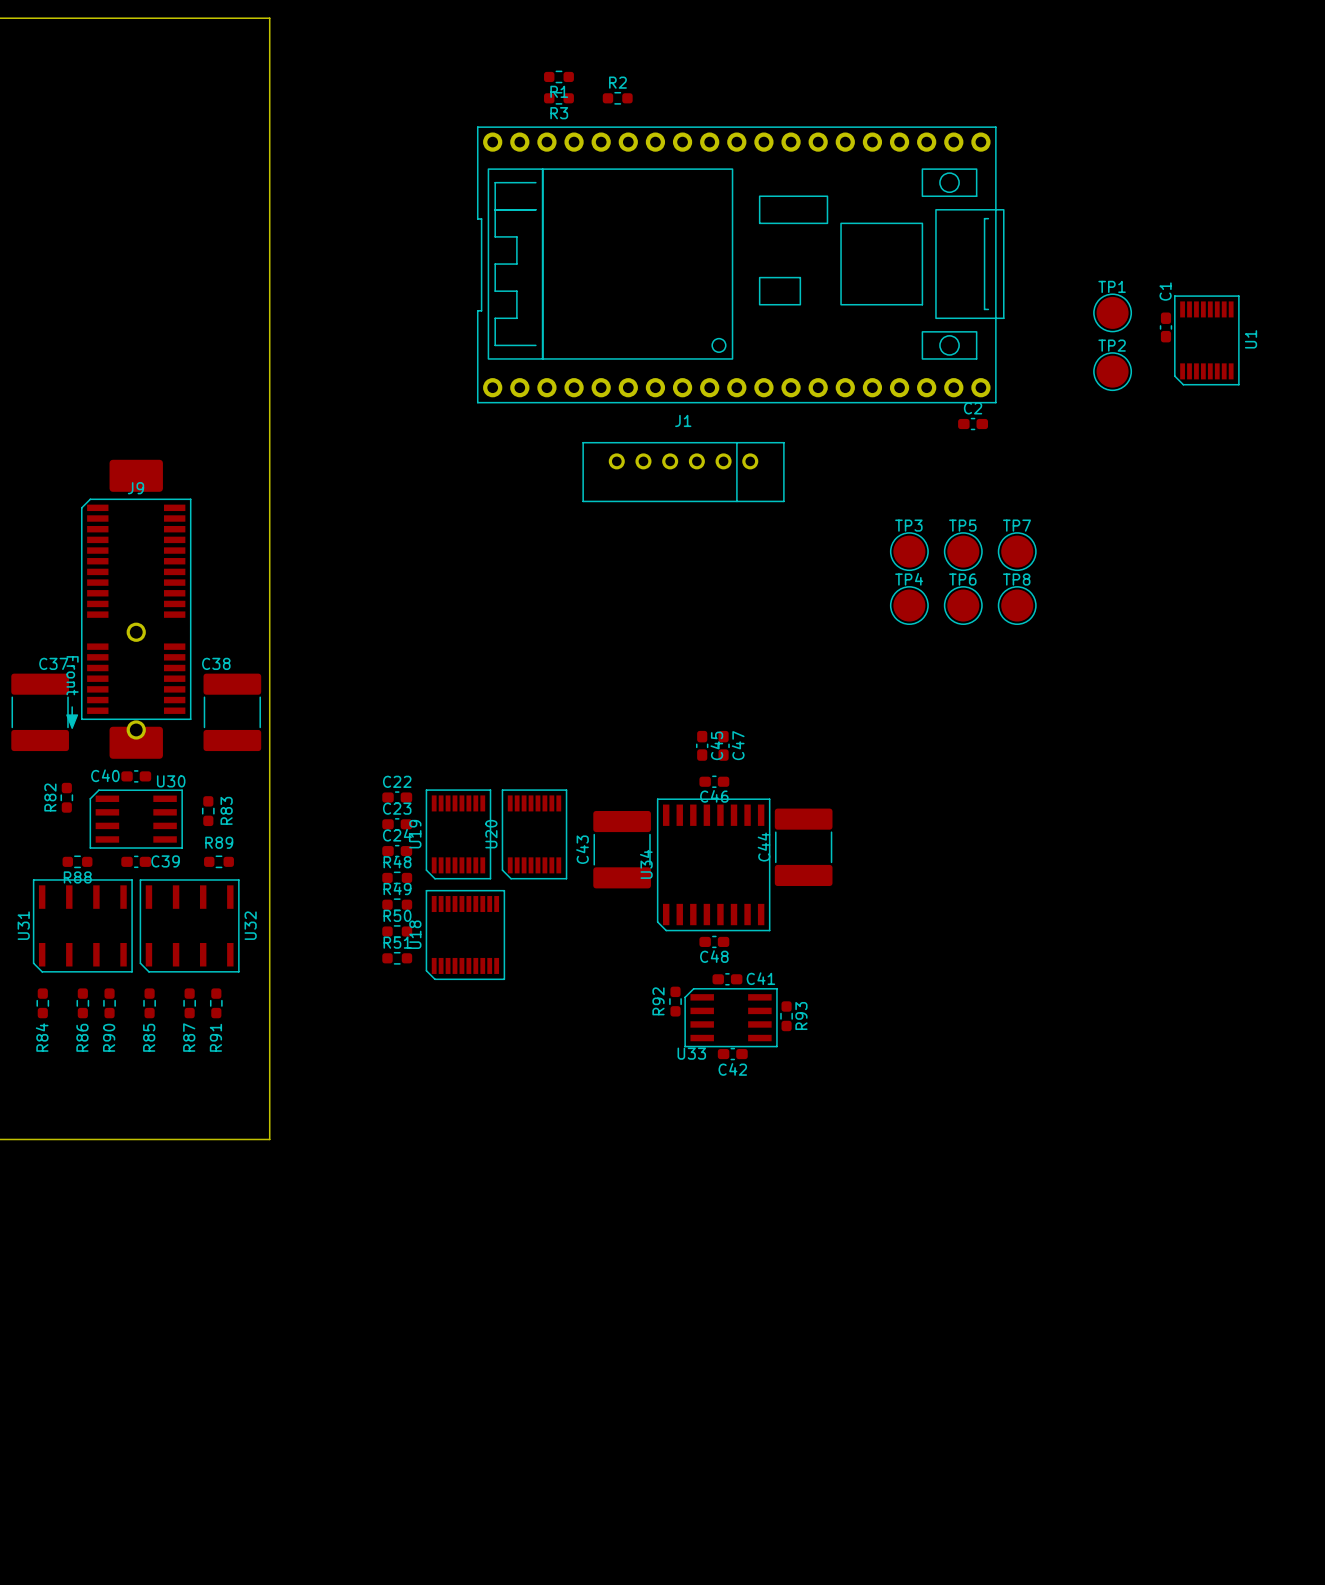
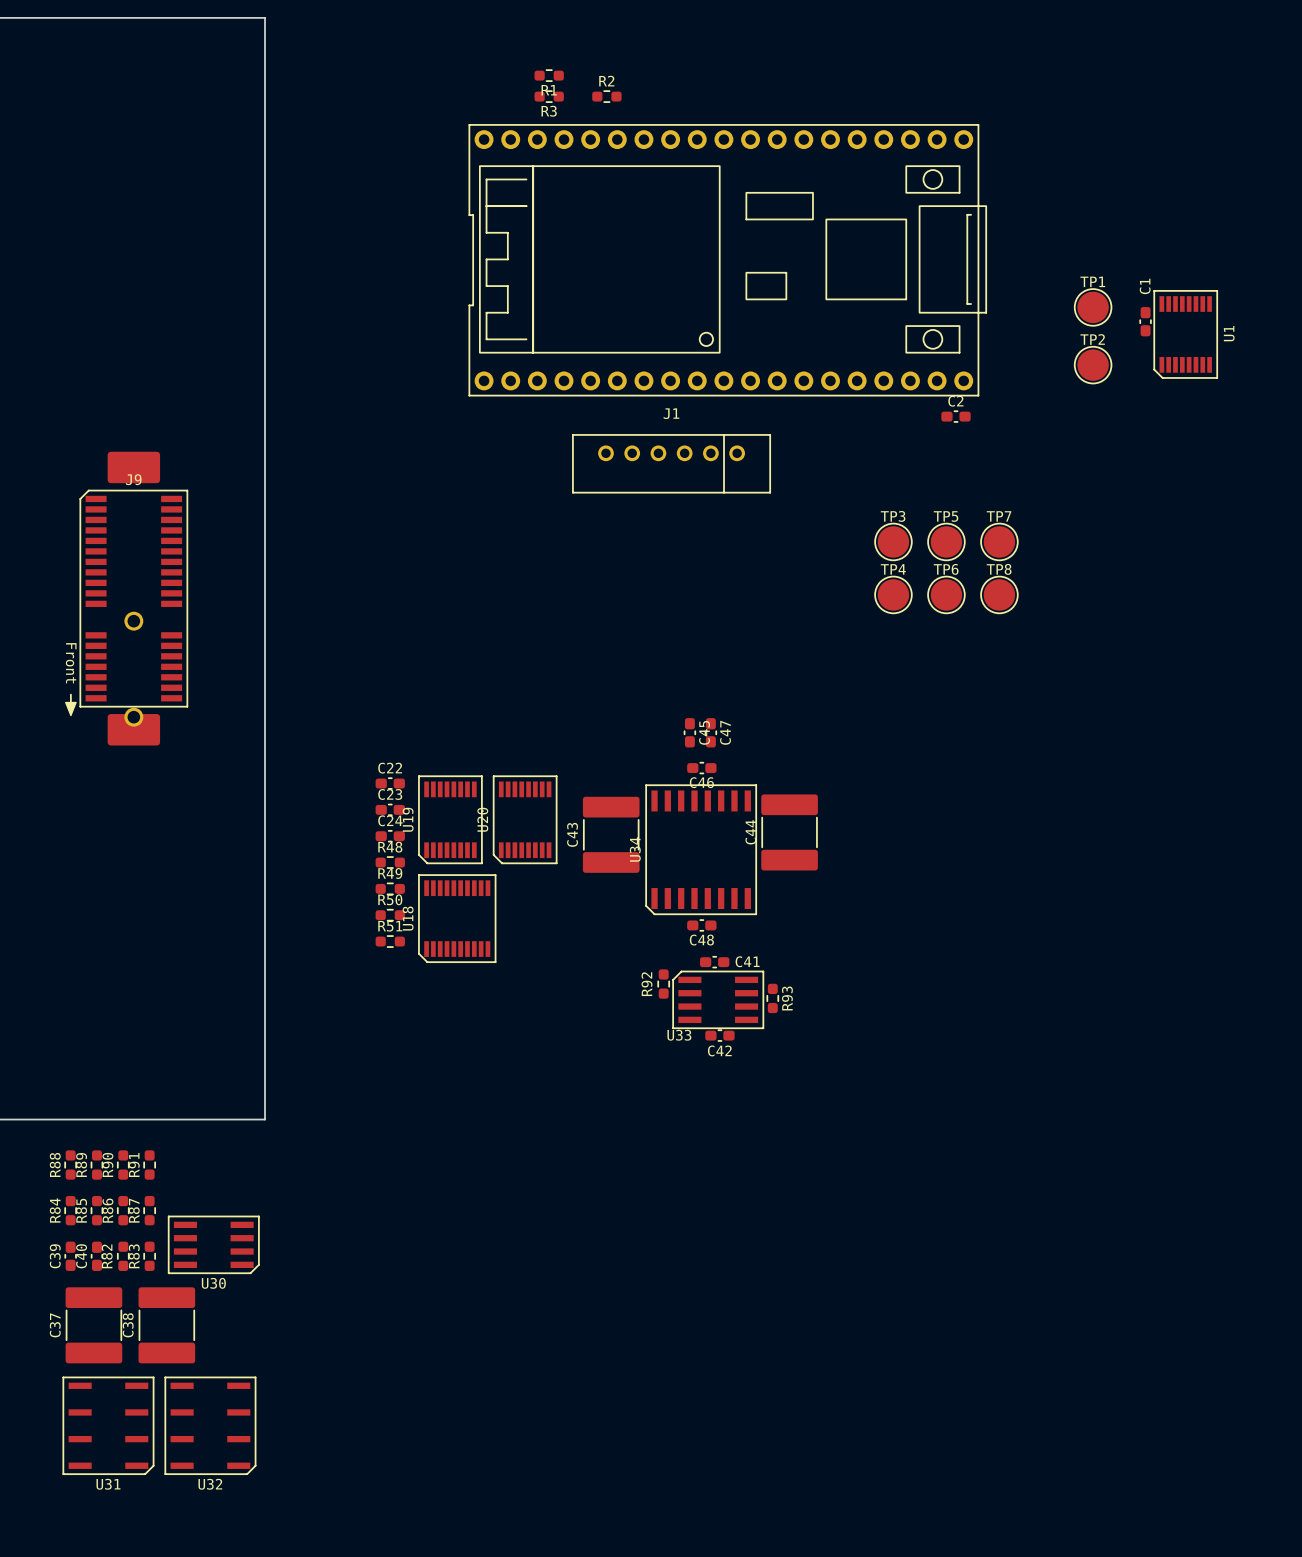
C37 name rotation: 0° (53, 663) -> 90° counterclockwise (55, 1325)
C37 name position: C37 (53, 663) -> C37 (55, 1325)
C38 name rotation: 0° (216, 663) -> 90° counterclockwise (128, 1325)
C38 name position: C38 (216, 663) -> C38 (128, 1325)
C37 position: (40, 712) -> (93, 1325)
C38 position: (232, 712) -> (166, 1325)
C40 rotation: 0° (136, 776) -> 90° clockwise (96, 1256)
C40 position: (136, 776) -> (96, 1256)
U30 name position: U30 (171, 781) -> U30 (213, 1283)
R82 position: (66, 797) -> (123, 1256)
R83 name position: R83 (226, 810) -> R83 (134, 1256)
R83 position: (208, 811) -> (149, 1256)
U30 rotation: 0° (136, 819) -> 180° (213, 1244)
U30 position: (136, 819) -> (213, 1244)
R89 name position: R89 (219, 842) -> R89 (81, 1165)
R88 rotation: 0° (77, 861) -> 90° clockwise (70, 1165)
R88 position: (77, 861) -> (70, 1165)
C39 rotation: 0° (136, 861) -> 90° clockwise (70, 1256)
C39 position: (136, 861) -> (70, 1256)
C39 name position: C39 (165, 861) -> C39 (55, 1256)
R89 rotation: 0° (219, 861) -> 90° clockwise (96, 1165)
R89 position: (219, 861) -> (96, 1165)
U31 rotation: 0° (82, 925) -> 90° counterclockwise (108, 1425)
U31 position: (82, 925) -> (108, 1425)
U32 rotation: 0° (189, 925) -> 90° counterclockwise (210, 1425)
U32 position: (189, 925) -> (210, 1425)
U32 name position: U32 (250, 925) -> U32 (210, 1484)
R84 position: (42, 1003) -> (70, 1210)
R86 position: (82, 1003) -> (123, 1210)
R90 position: (109, 1003) -> (123, 1165)
R85 position: (149, 1003) -> (96, 1210)
R87 position: (189, 1003) -> (149, 1210)
R91 position: (216, 1003) -> (149, 1165)
R84 name position: R84 (42, 1037) -> R84 (55, 1210)
R86 name position: R86 (82, 1037) -> R86 (107, 1210)
R90 name position: R90 (109, 1037) -> R90 (107, 1164)
R85 name position: R85 (149, 1037) -> R85 (81, 1210)
R87 name position: R87 (189, 1037) -> R87 (134, 1210)
R91 name position: R91 (215, 1037) -> R91 (134, 1165)

